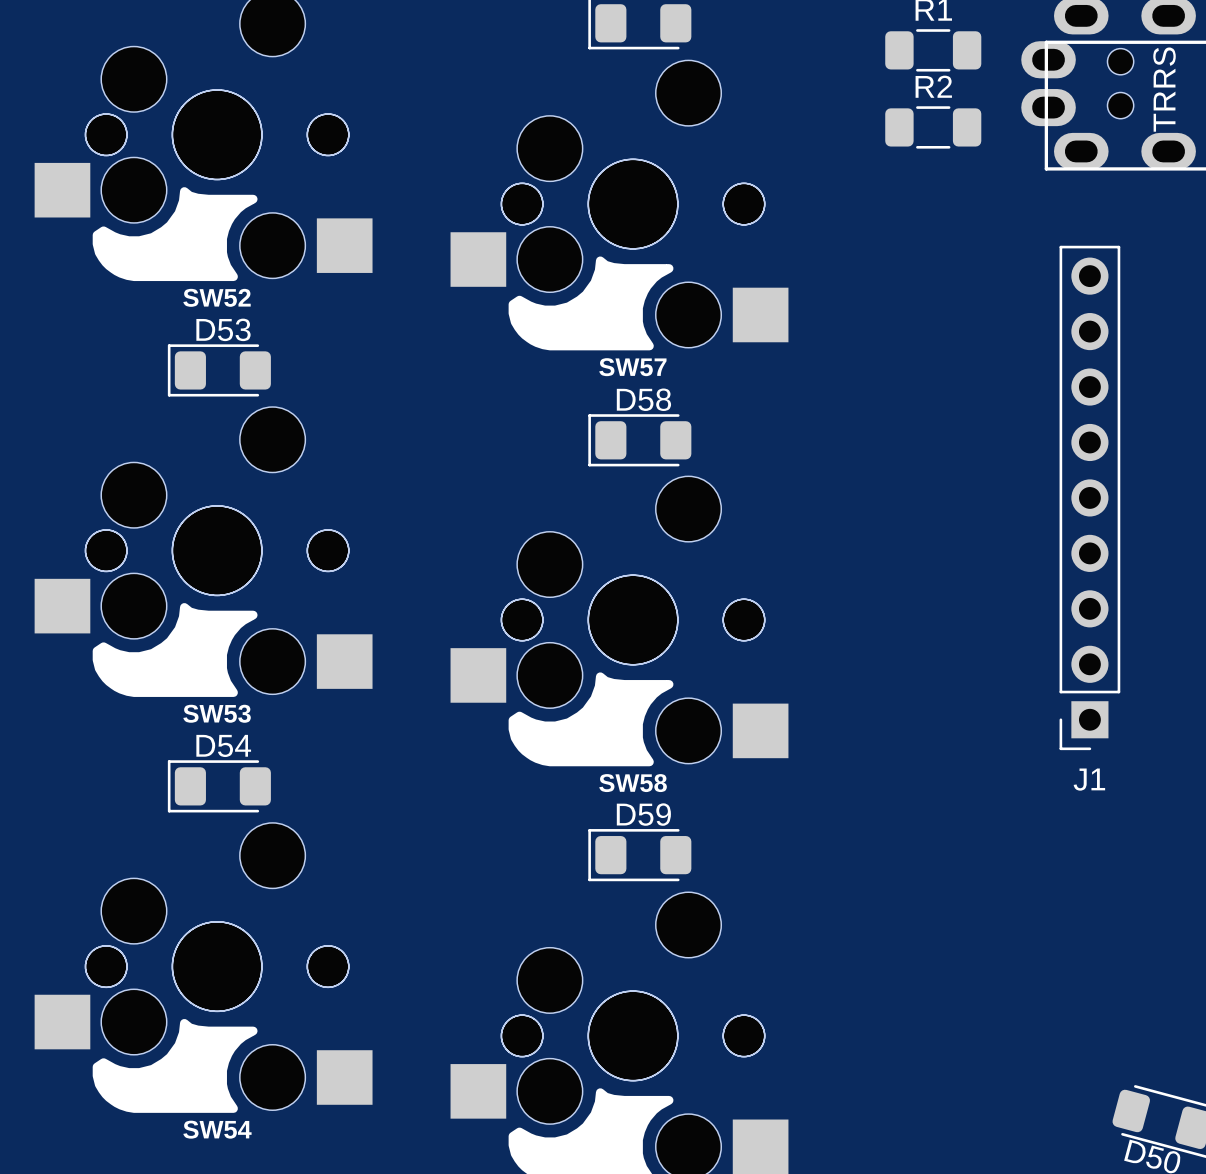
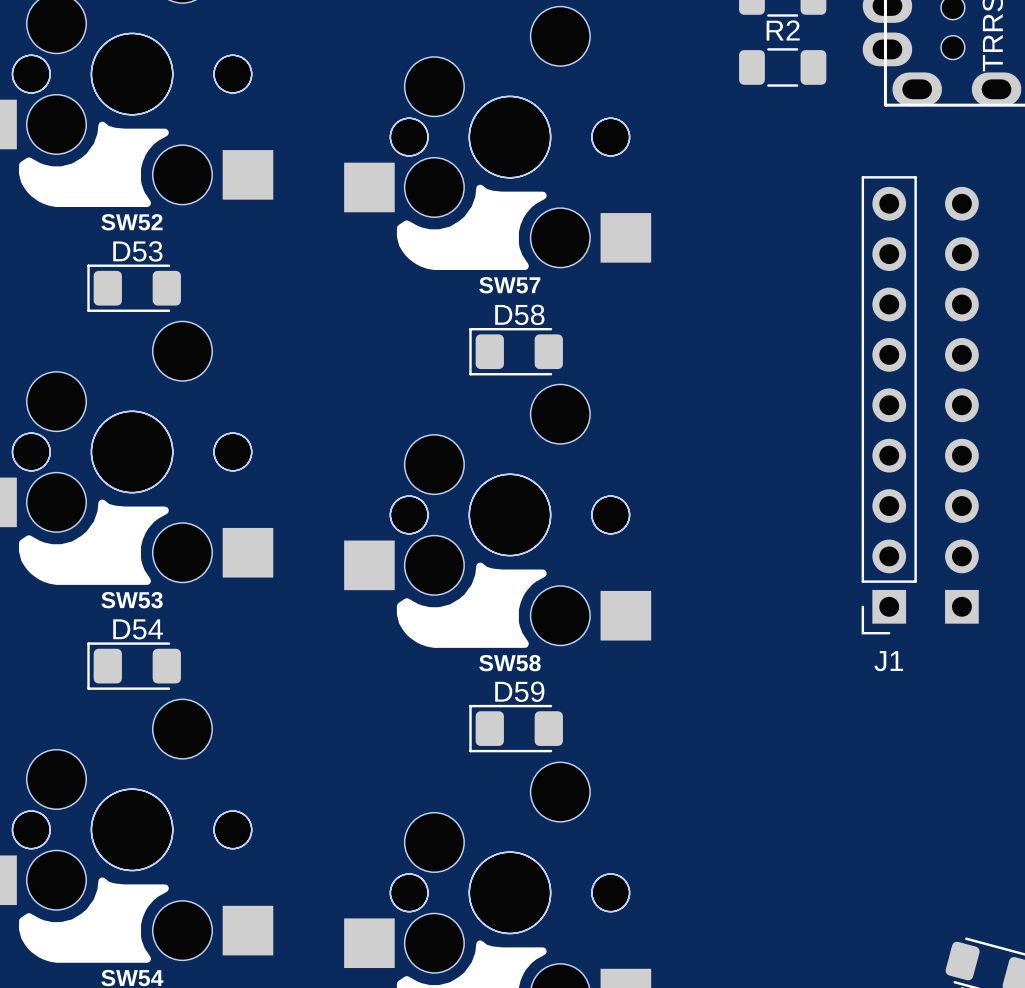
J1 position: (1089, 497) -> (889, 405)
part: none -> (961, 405)

